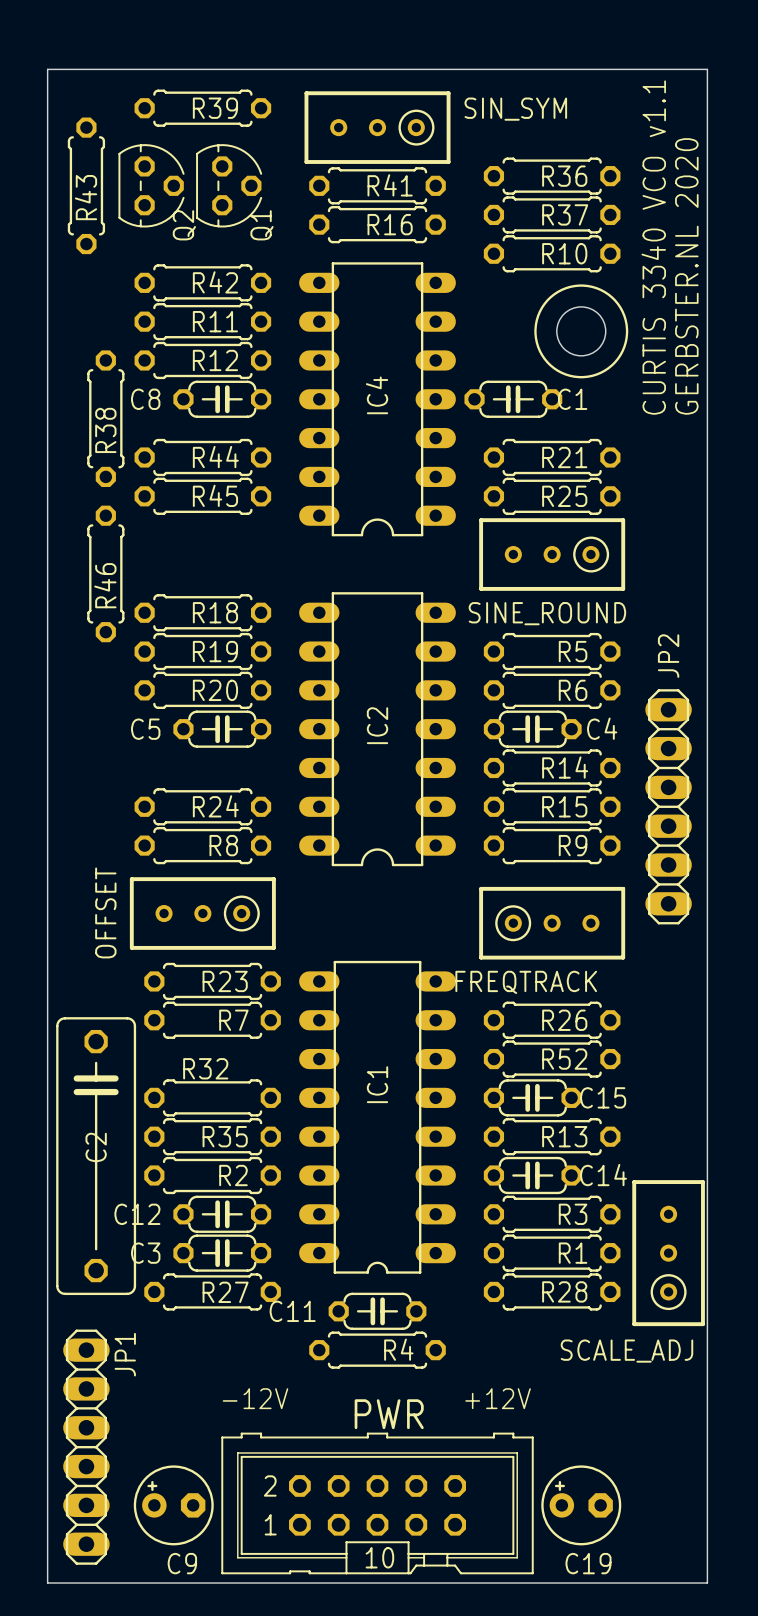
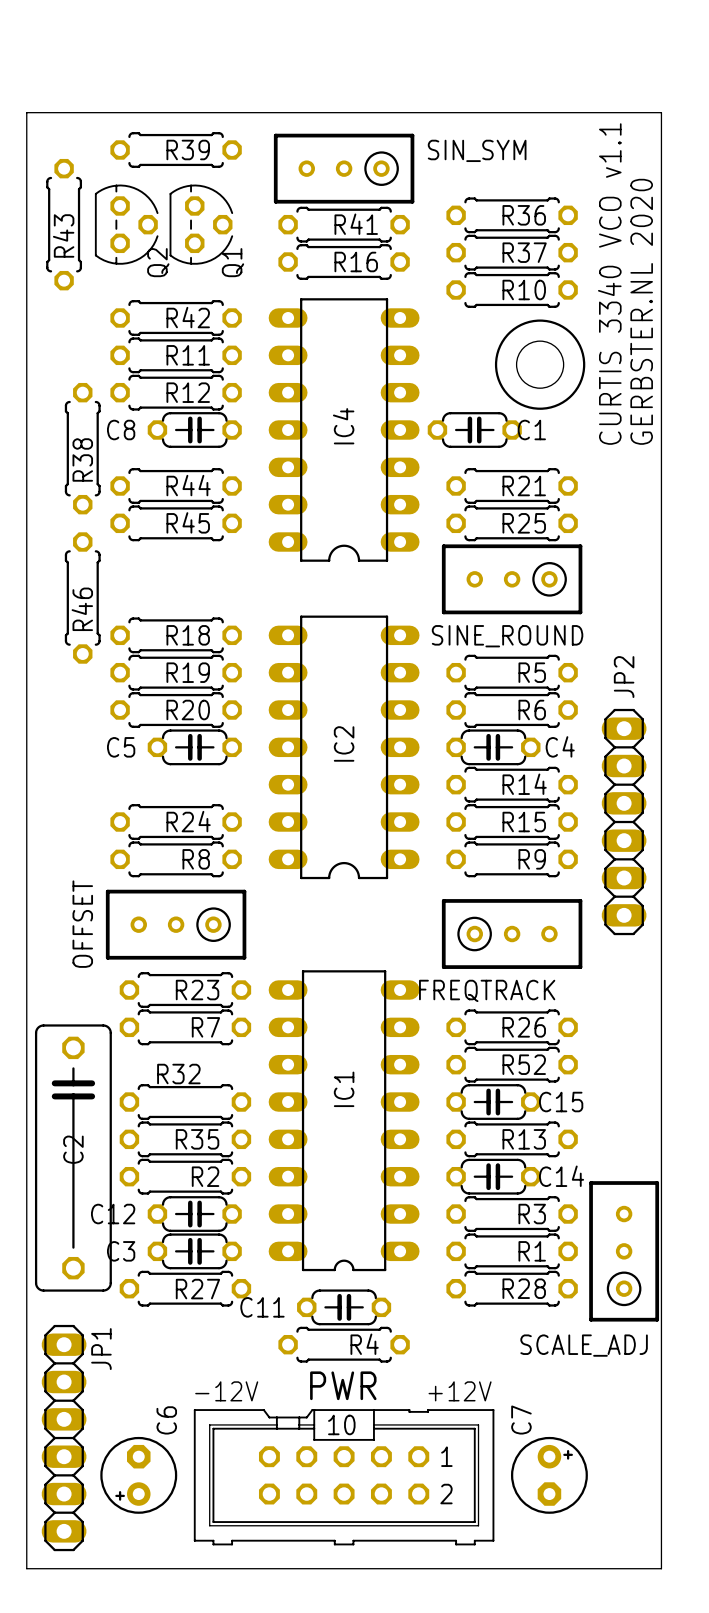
C6: none -> (138, 1475)
C7: none -> (549, 1475)
PWR: none -> (344, 1477)
PWR: (377, 1503) -> none
C9: (173, 1505) -> none
C19: (581, 1505) -> none

